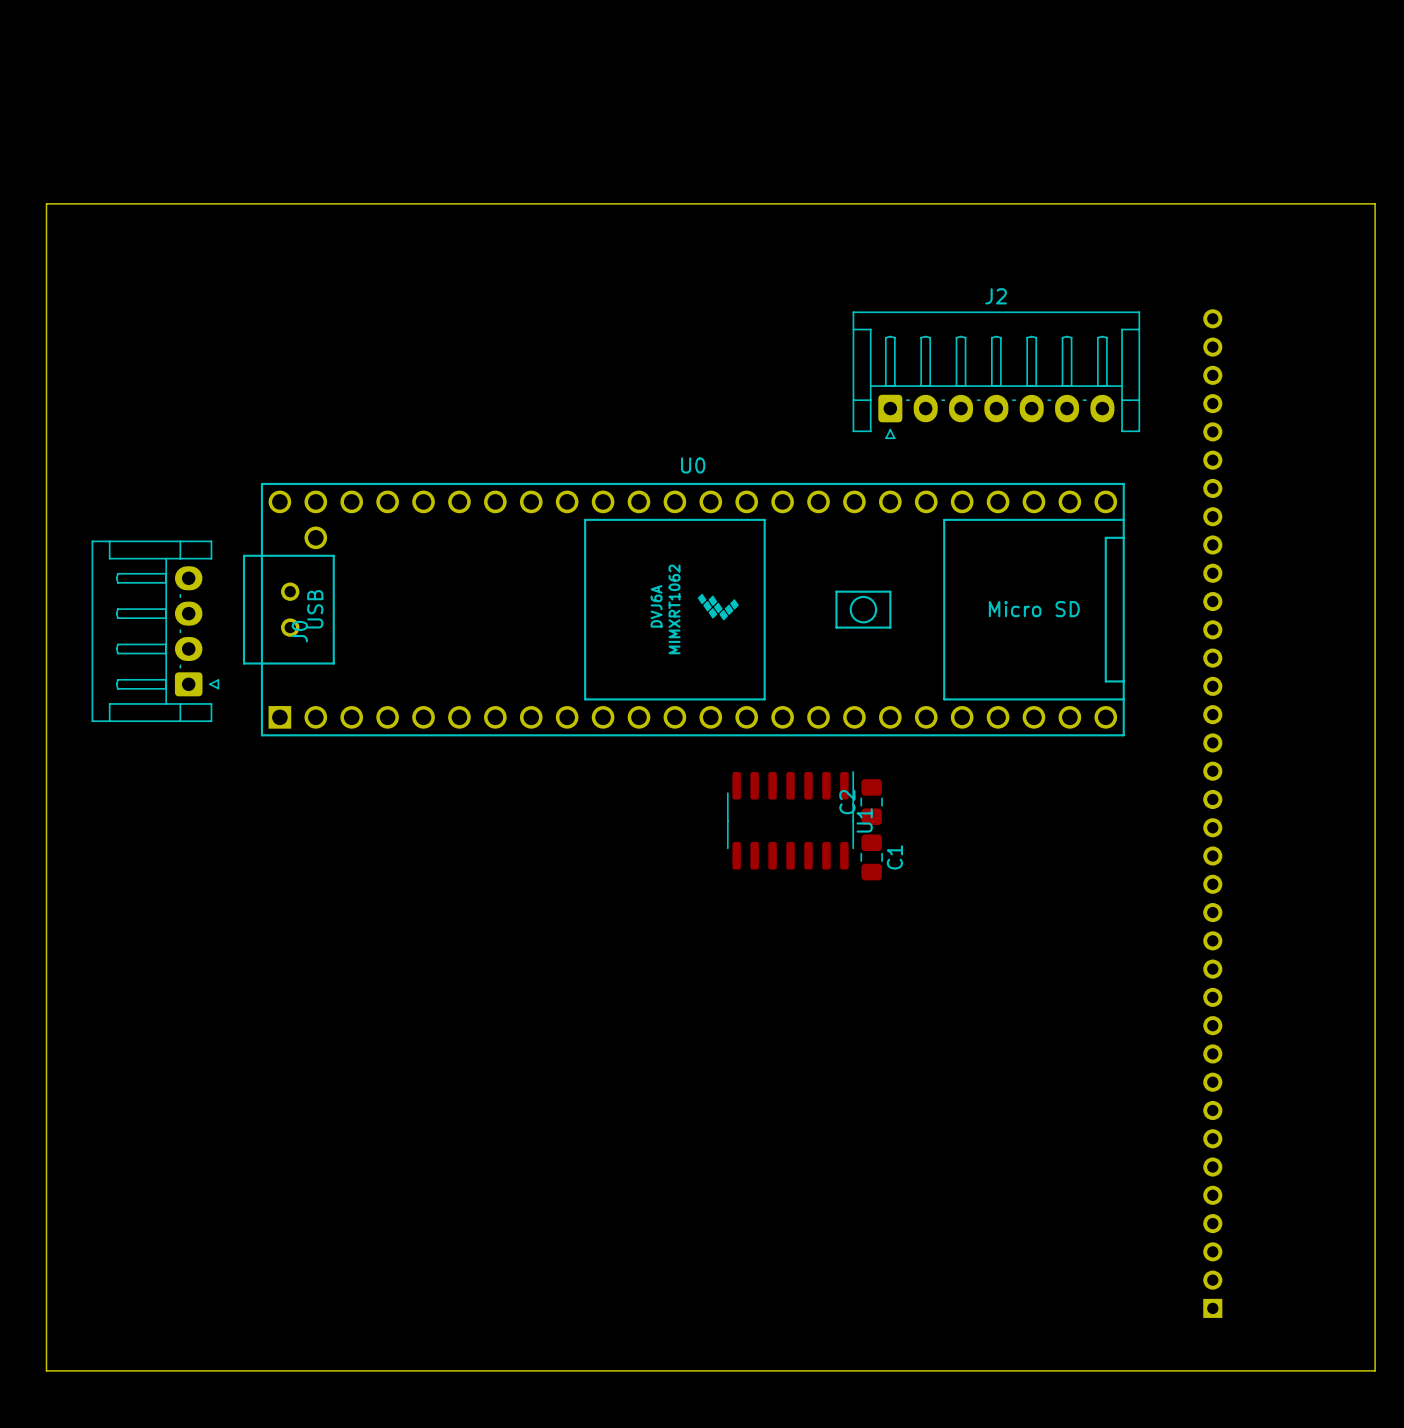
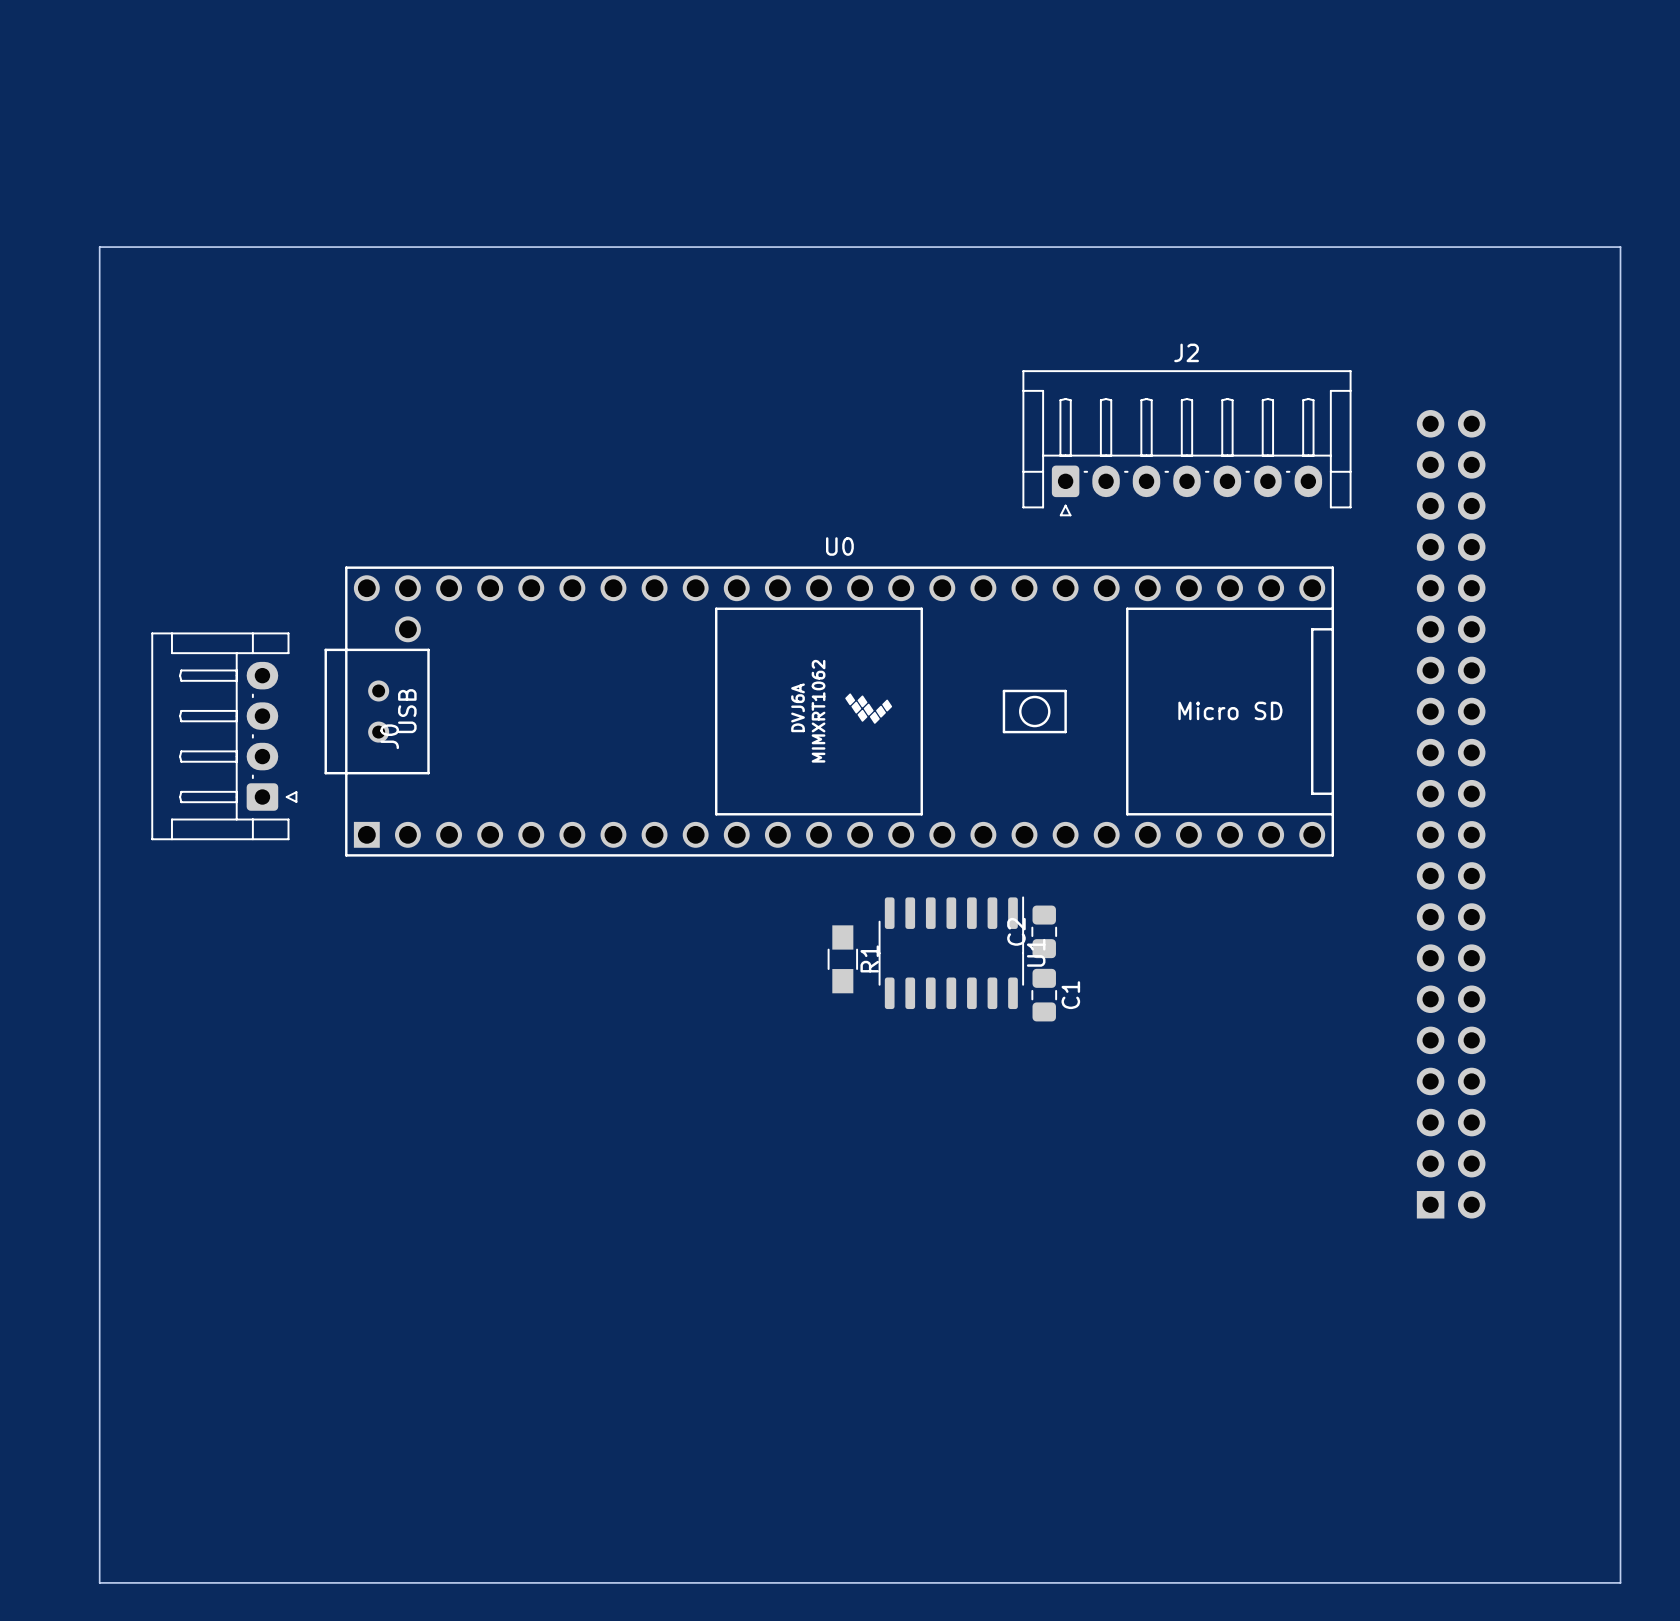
part: none -> (1451, 814)
part: (1212, 813) -> none
R1: none -> (842, 959)

